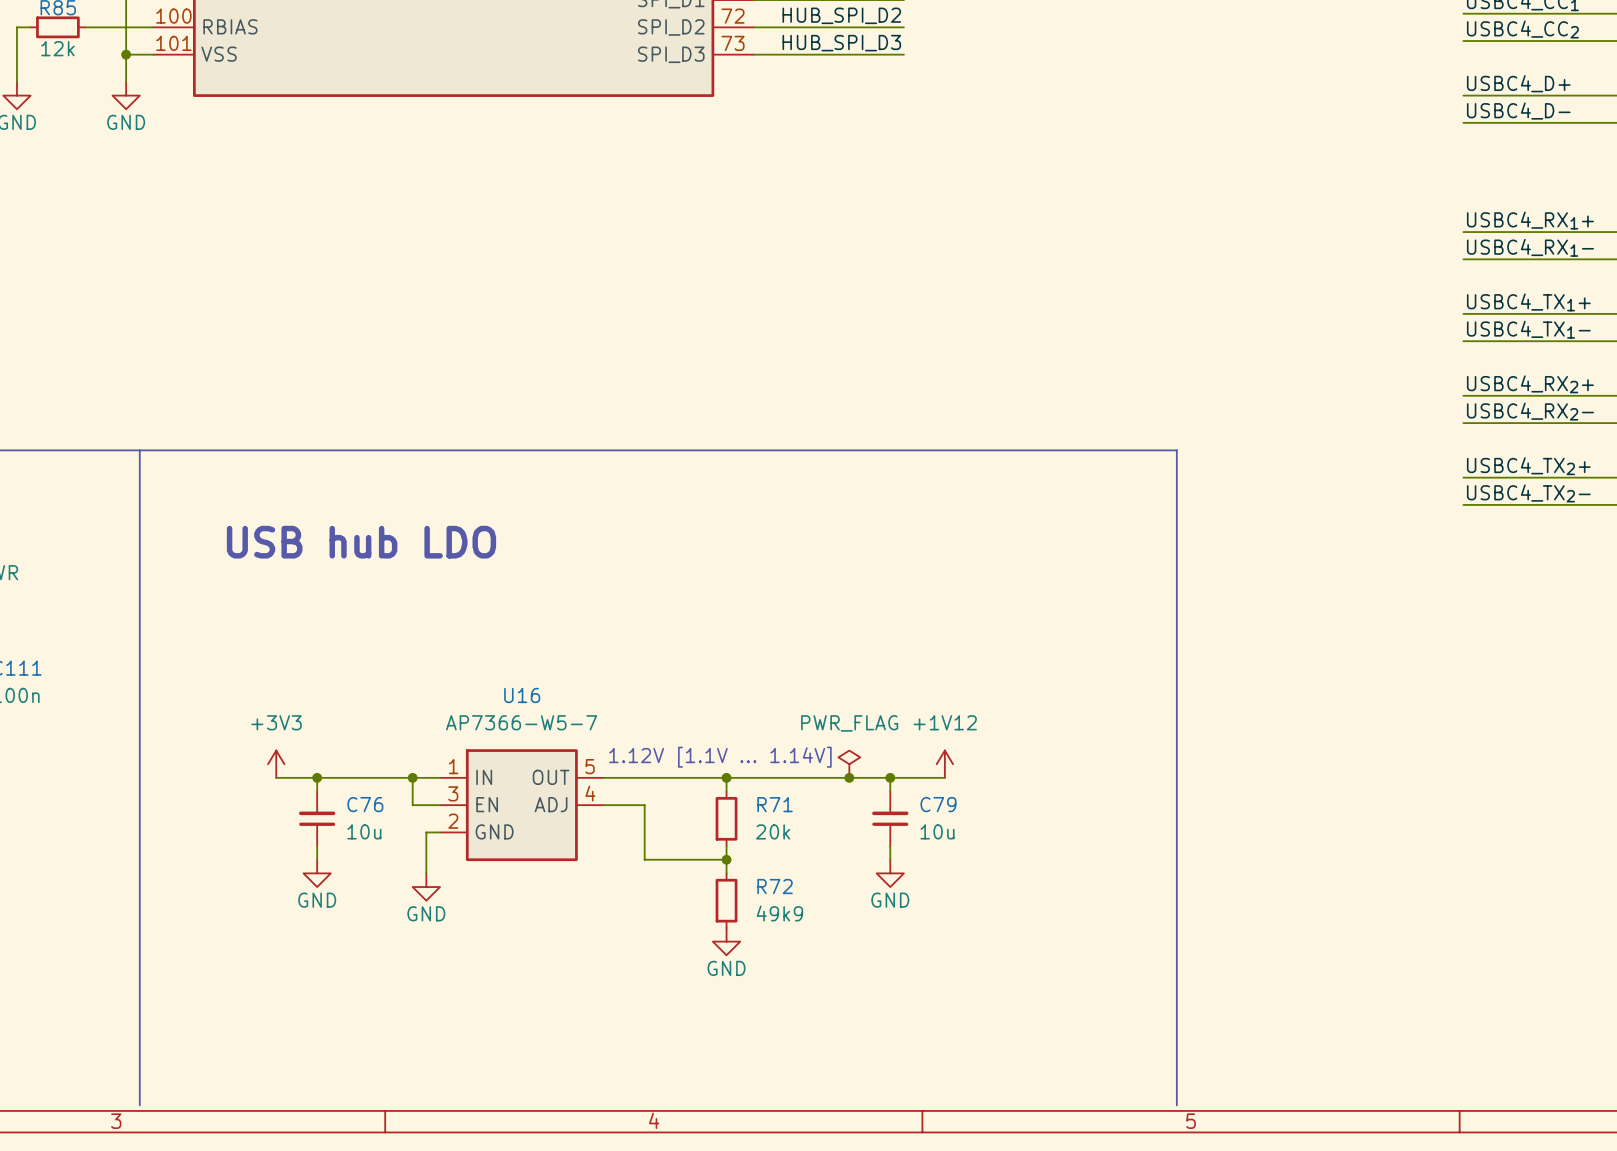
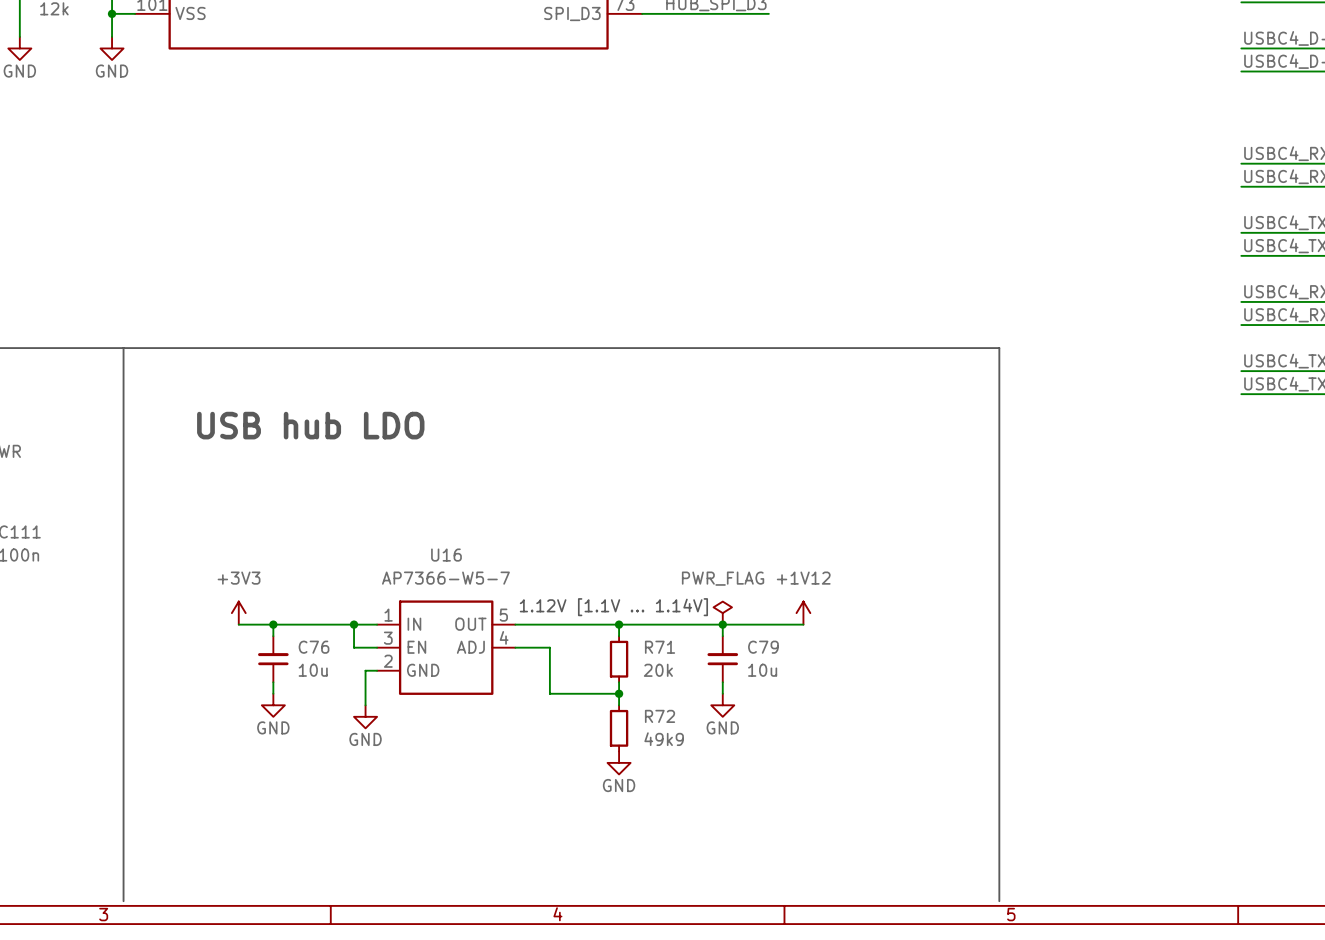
wire: (890, 777) (890, 791) -> (722, 624) (722, 636)
junction: (890, 777) -> none
C79 position: (890, 818) -> (722, 659)
wire: (890, 846) (890, 859) -> (722, 682) (722, 693)
power symbol position: GND (890, 873) -> GND (722, 705)

